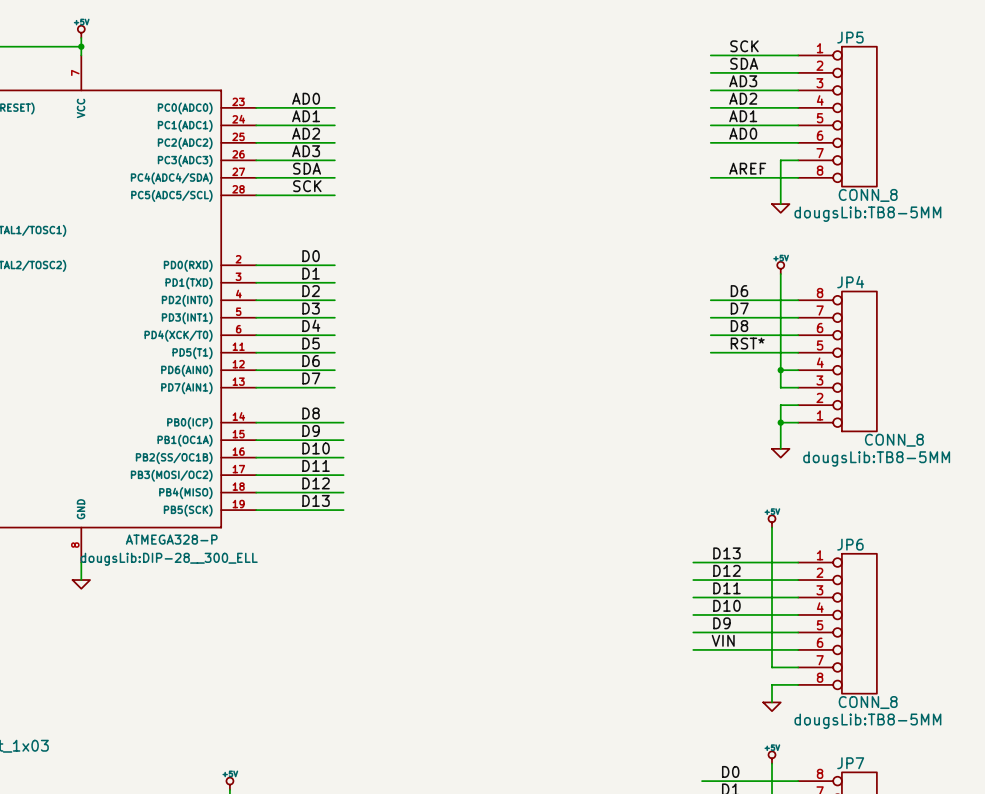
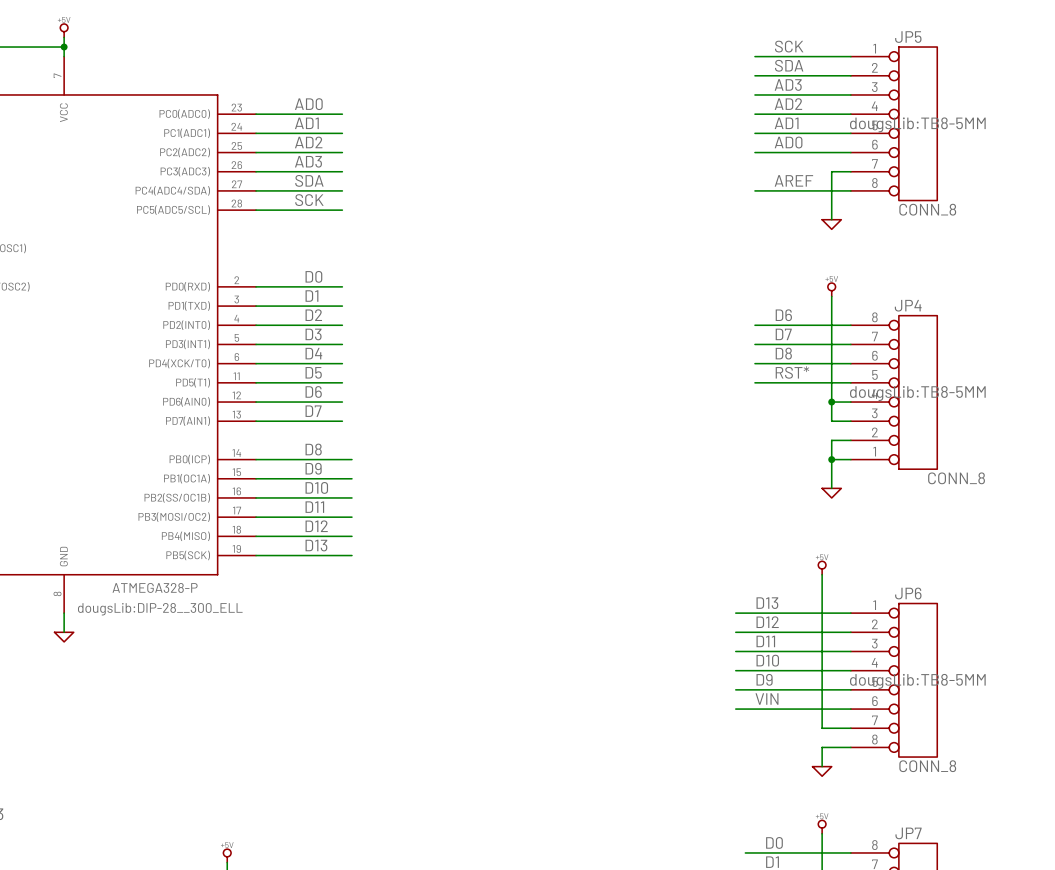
JP5 text position: dougsLib:TB8-5MM (867, 214) -> dougsLib:TB8-5MM (917, 124)
JP4 text position: dougsLib:TB8-5MM (876, 458) -> dougsLib:TB8-5MM (917, 393)
JP6 text position: dougsLib:TB8-5MM (867, 721) -> dougsLib:TB8-5MM (917, 681)

